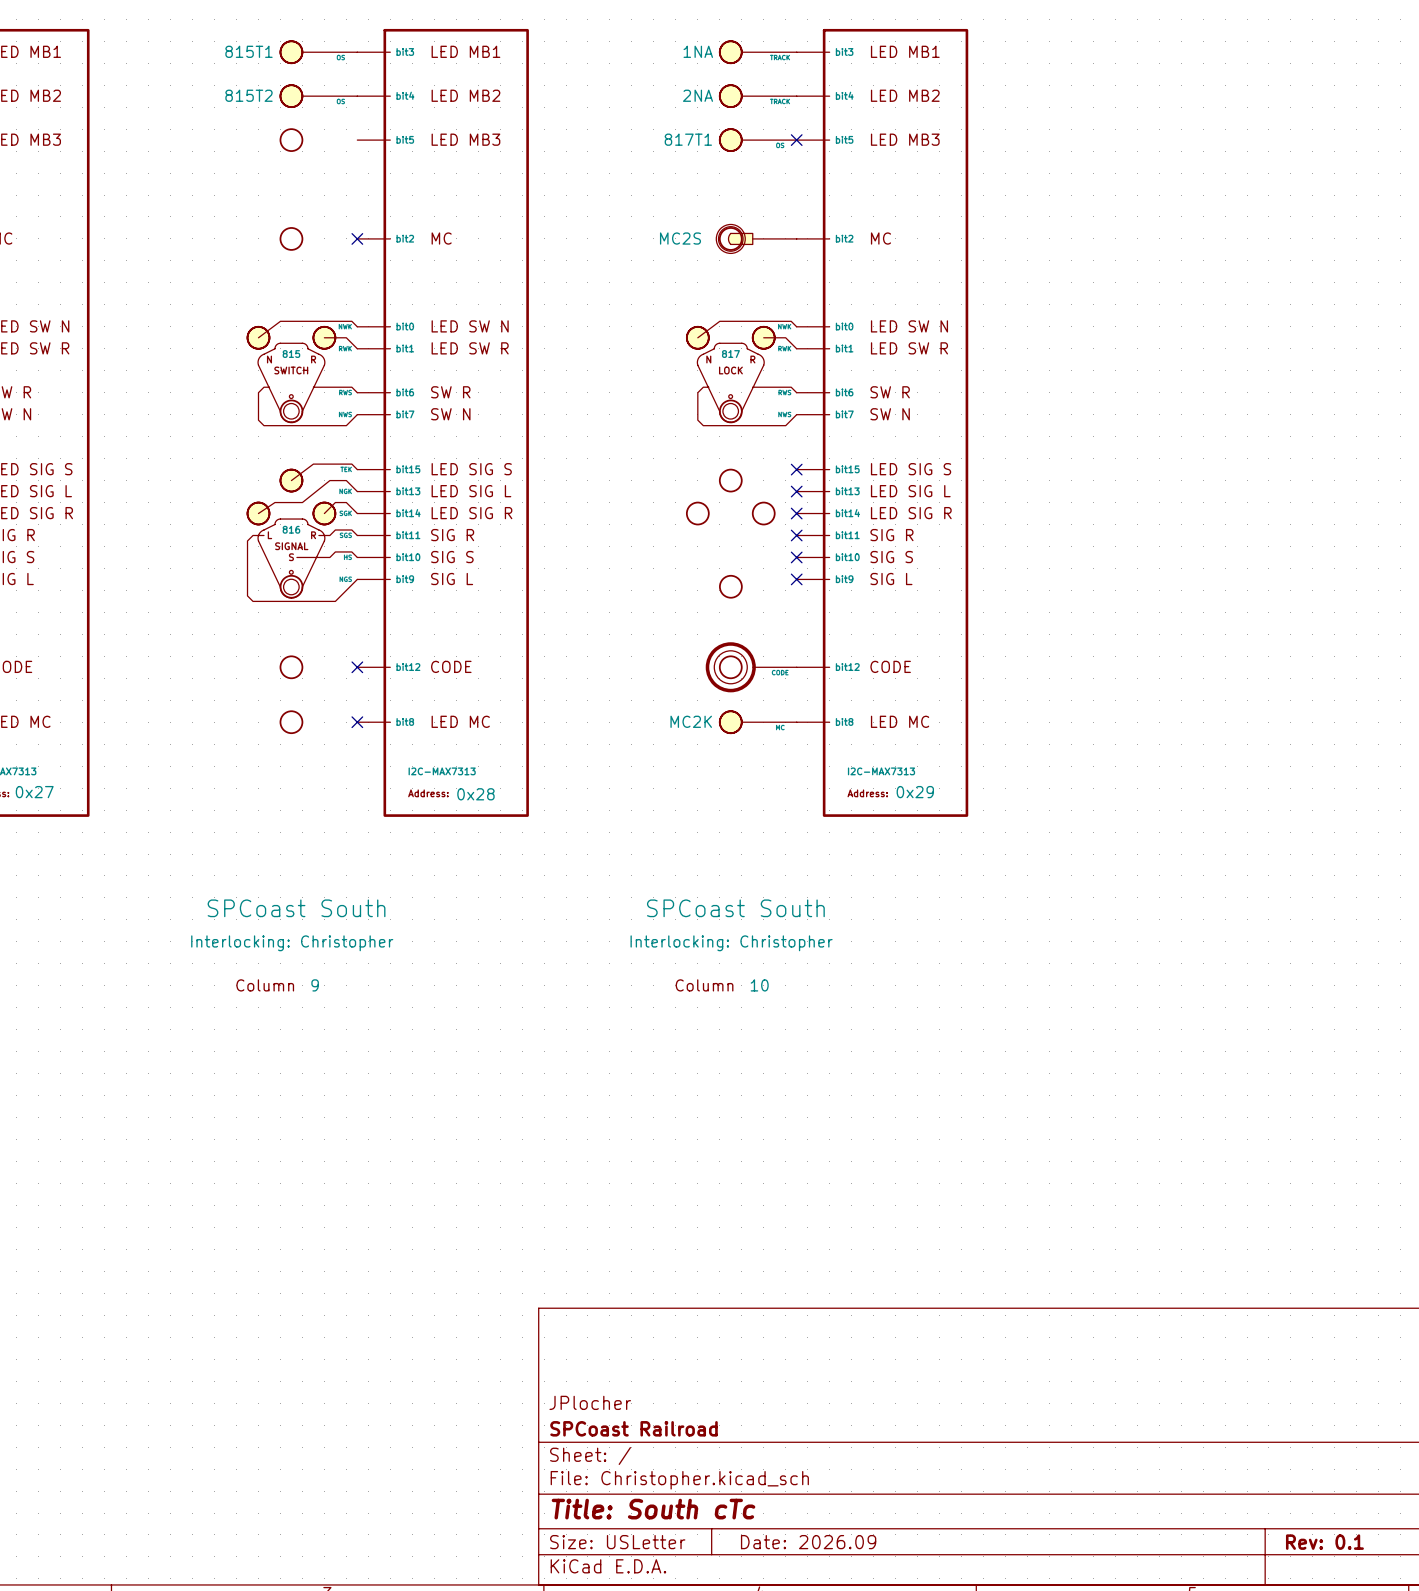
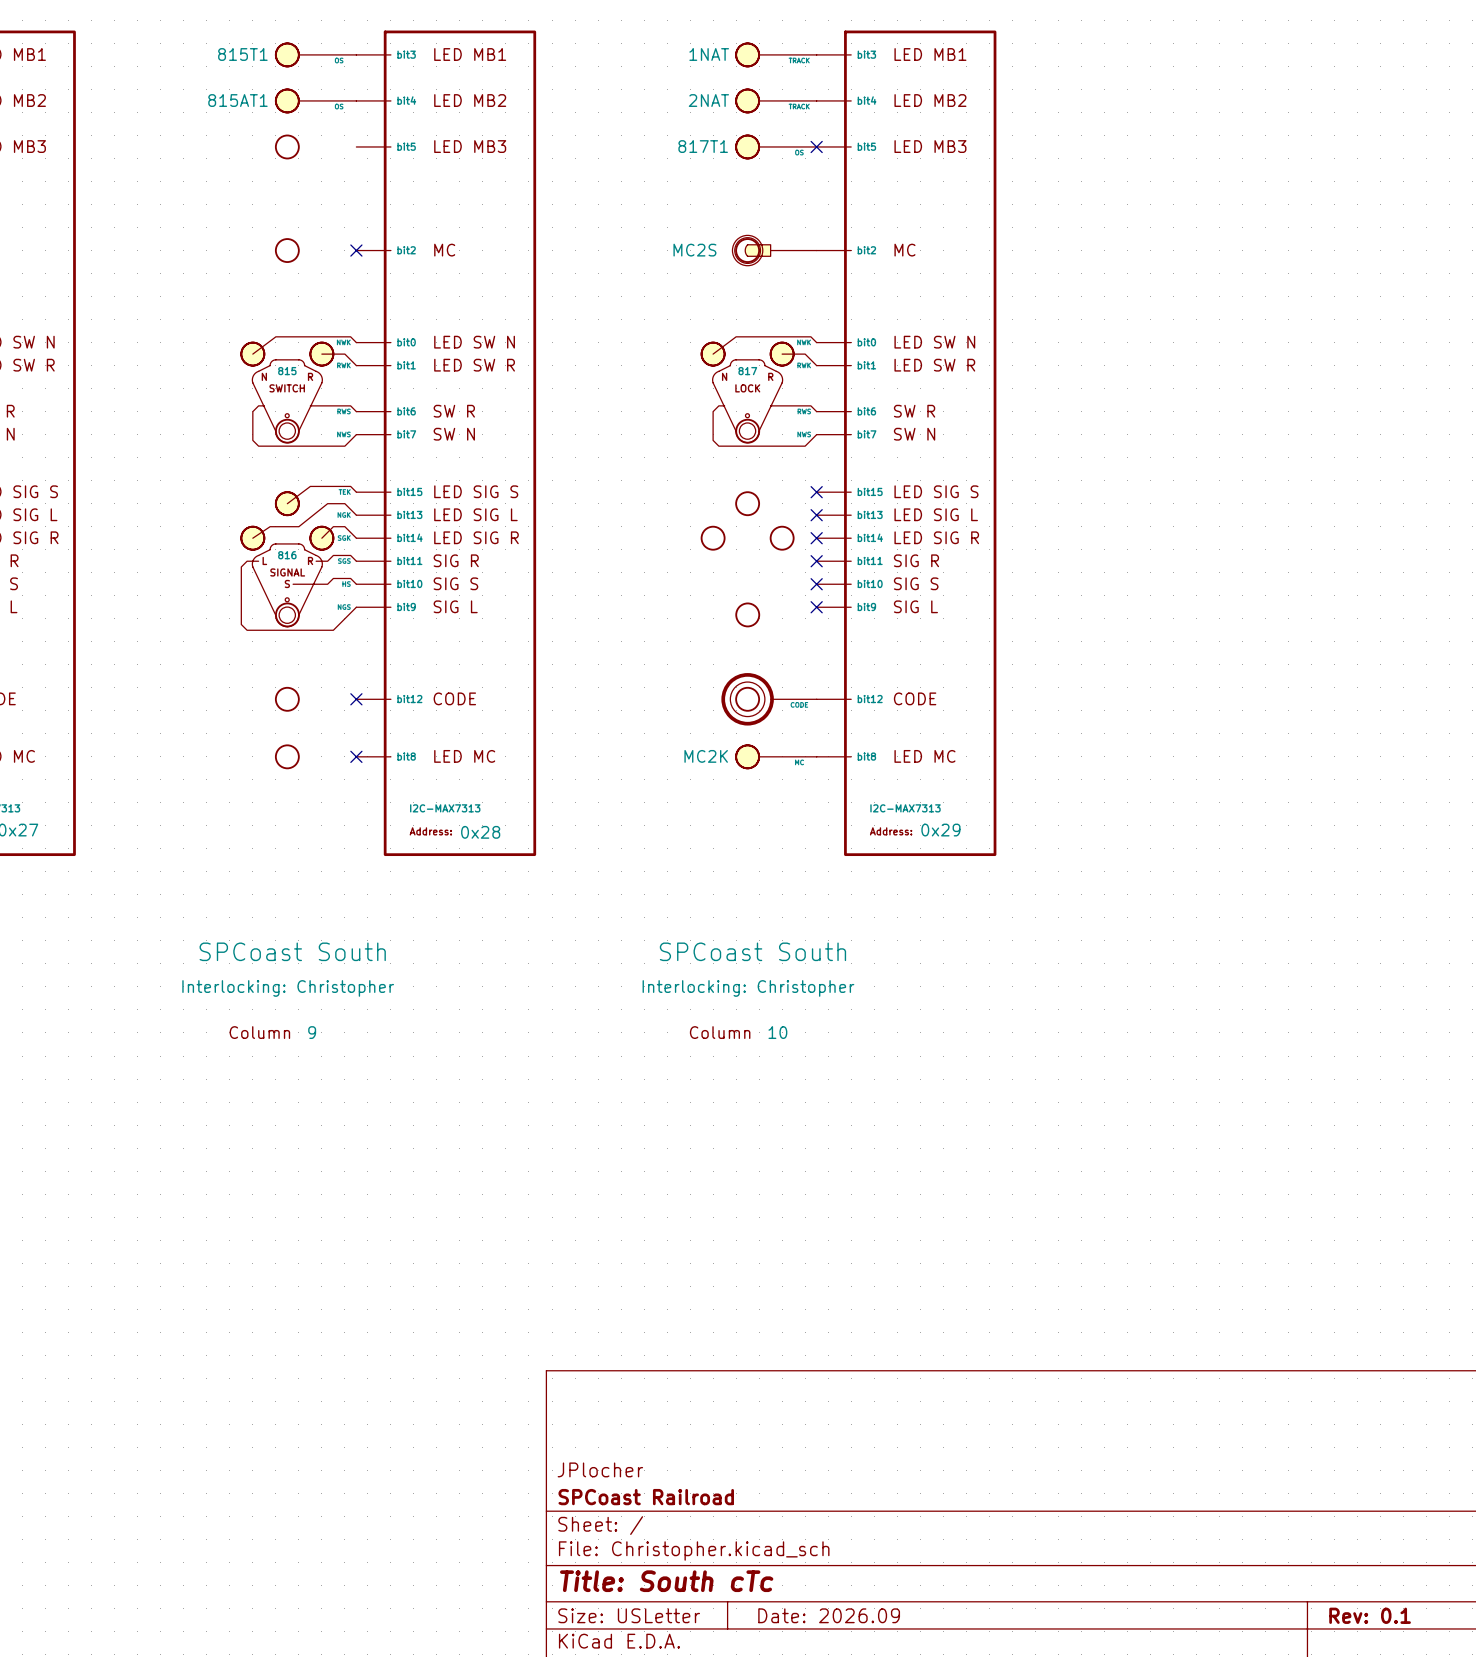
part text: 1NA (698, 51) -> 1NAT (709, 54)
part text: 815T2 (248, 95) -> 815AT1 (237, 100)
part text: 2NA (698, 95) -> 2NAT (708, 100)

